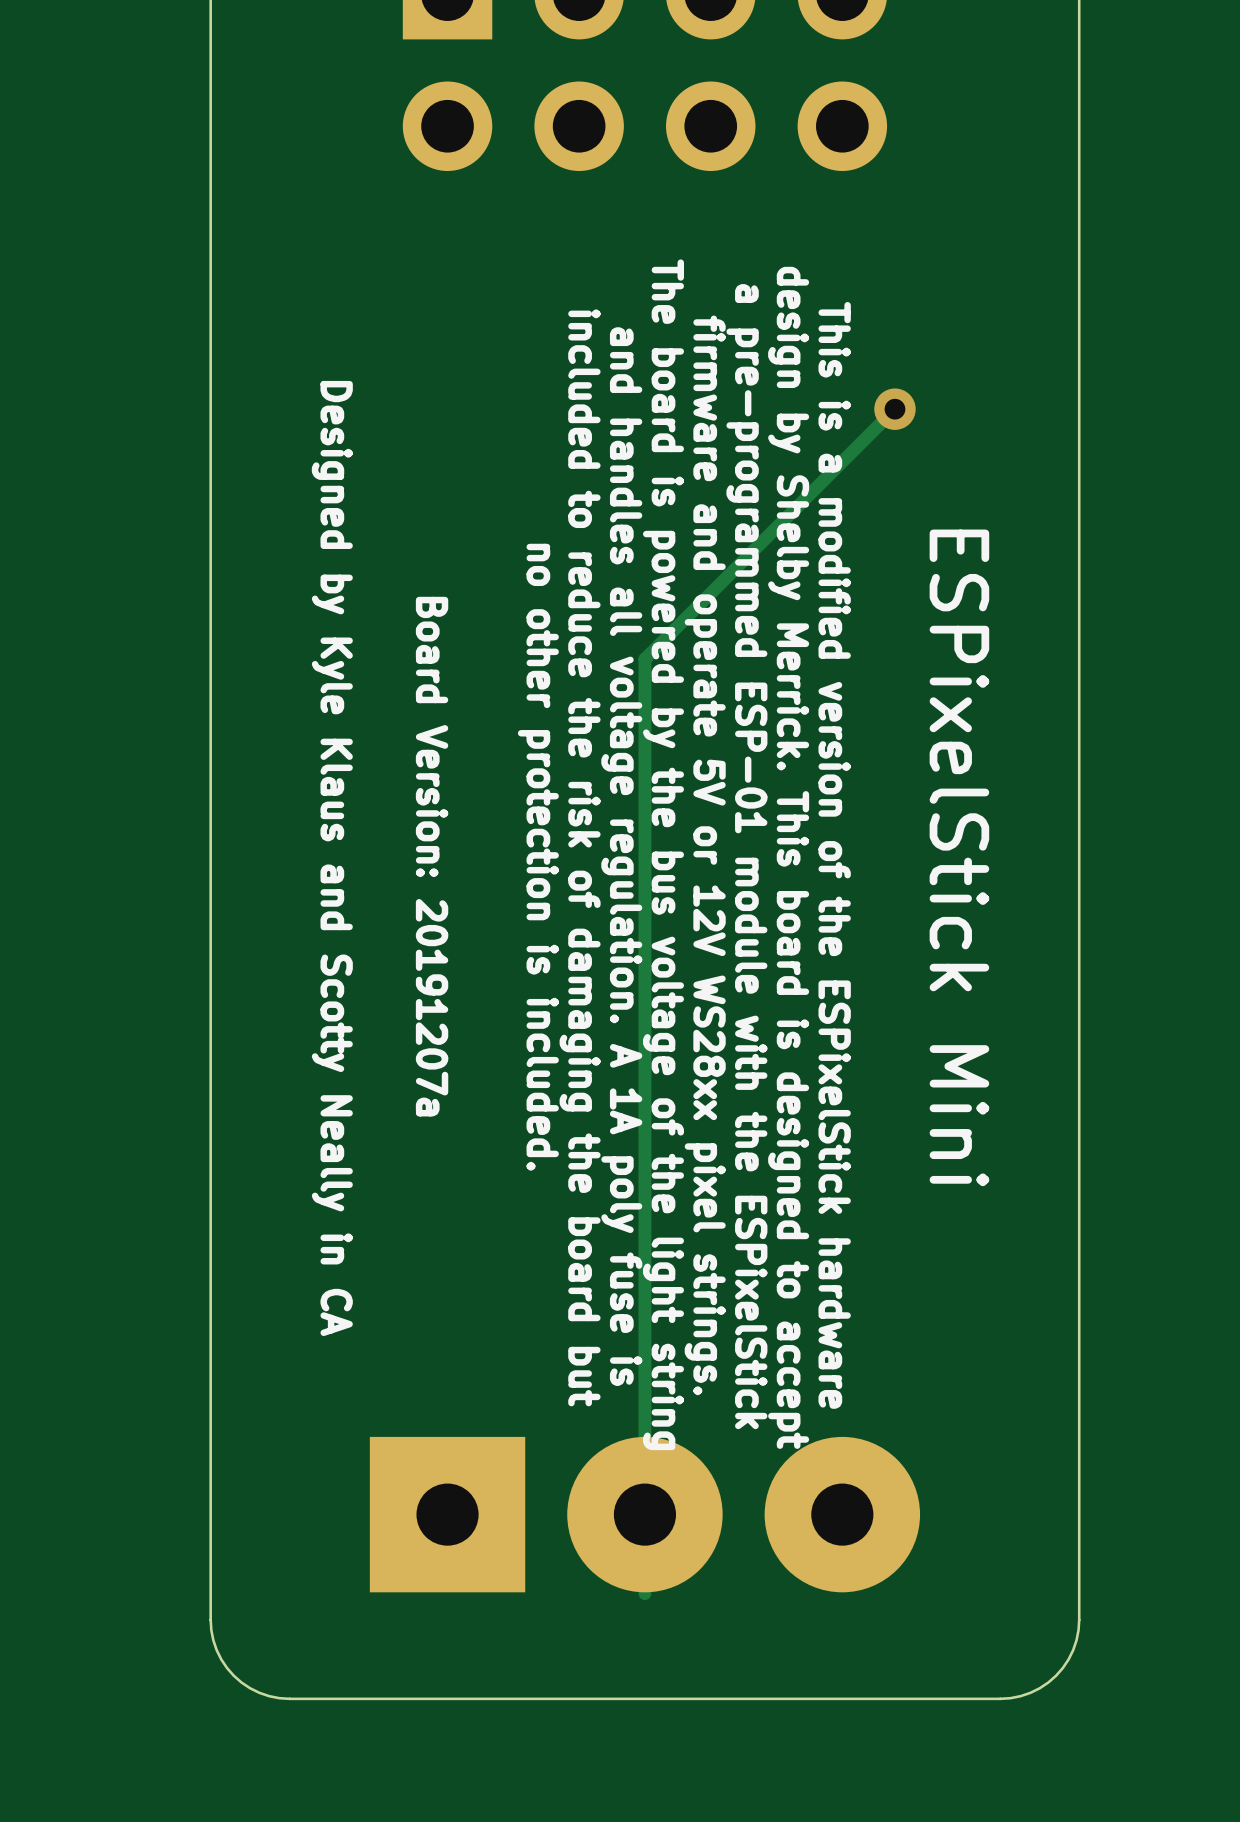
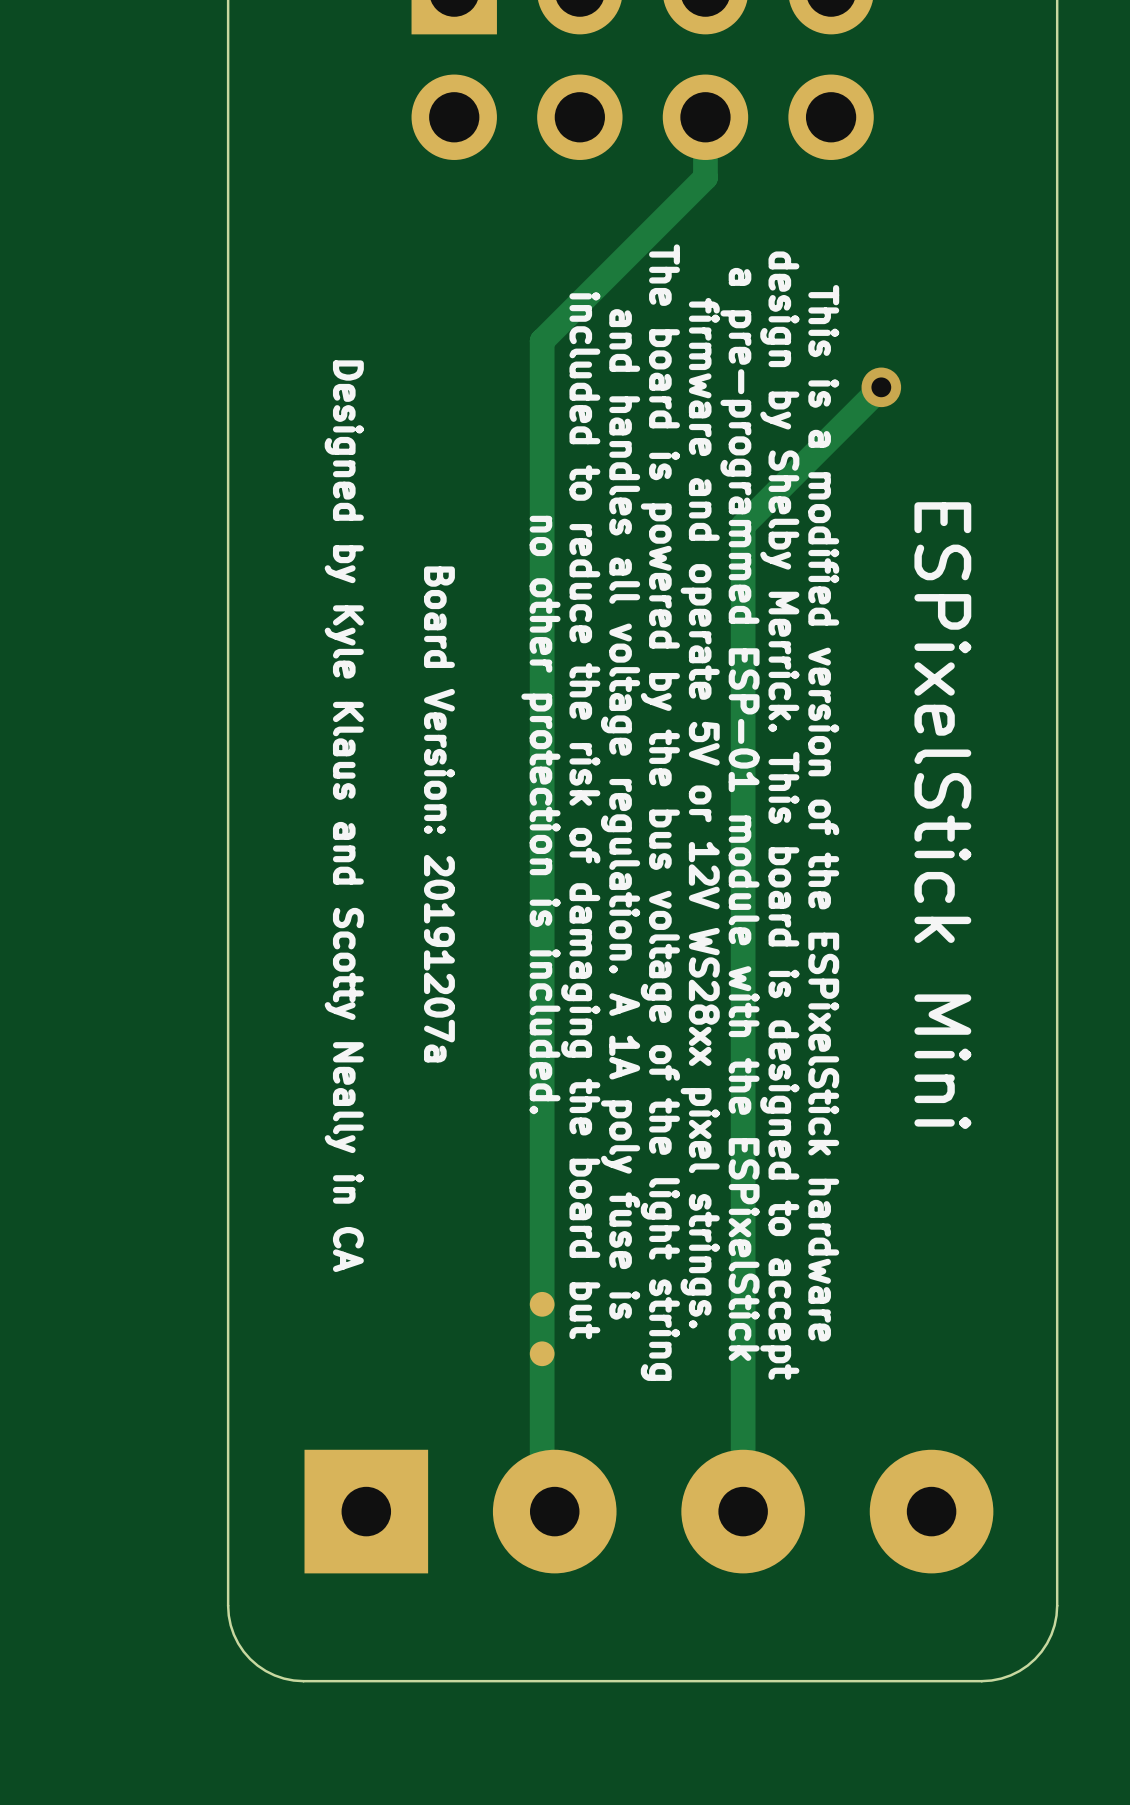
track: none -> (705, 117) (705, 177) (542, 340) (542, 1304)
track width: thin (894, 409) (750, 553) -> thick (881, 387) (743, 525)
track: (750, 553) (644, 659) (644, 1593) -> (743, 525) (743, 1511)
part: none -> (542, 1329)
track: none -> (542, 1354) (542, 1511)
part: (644, 1514) -> none
part: none -> (648, 1511)
board edge: (1079, 1619) (1073, 1650) (1056, 1675) (1030, 1692) (1000, 1698) (279, 1698) (259, 1692) (233, 1675) (216, 1650) (210, 1619) -> (1057, 1542) (1056, 1615) (1047, 1643) (1035, 1659) (1019, 1671) (1001, 1678) (981, 1681) (293, 1680) (274, 1675) (257, 1665) (243, 1651) (233, 1634) (228, 1605) (228, 1542)

